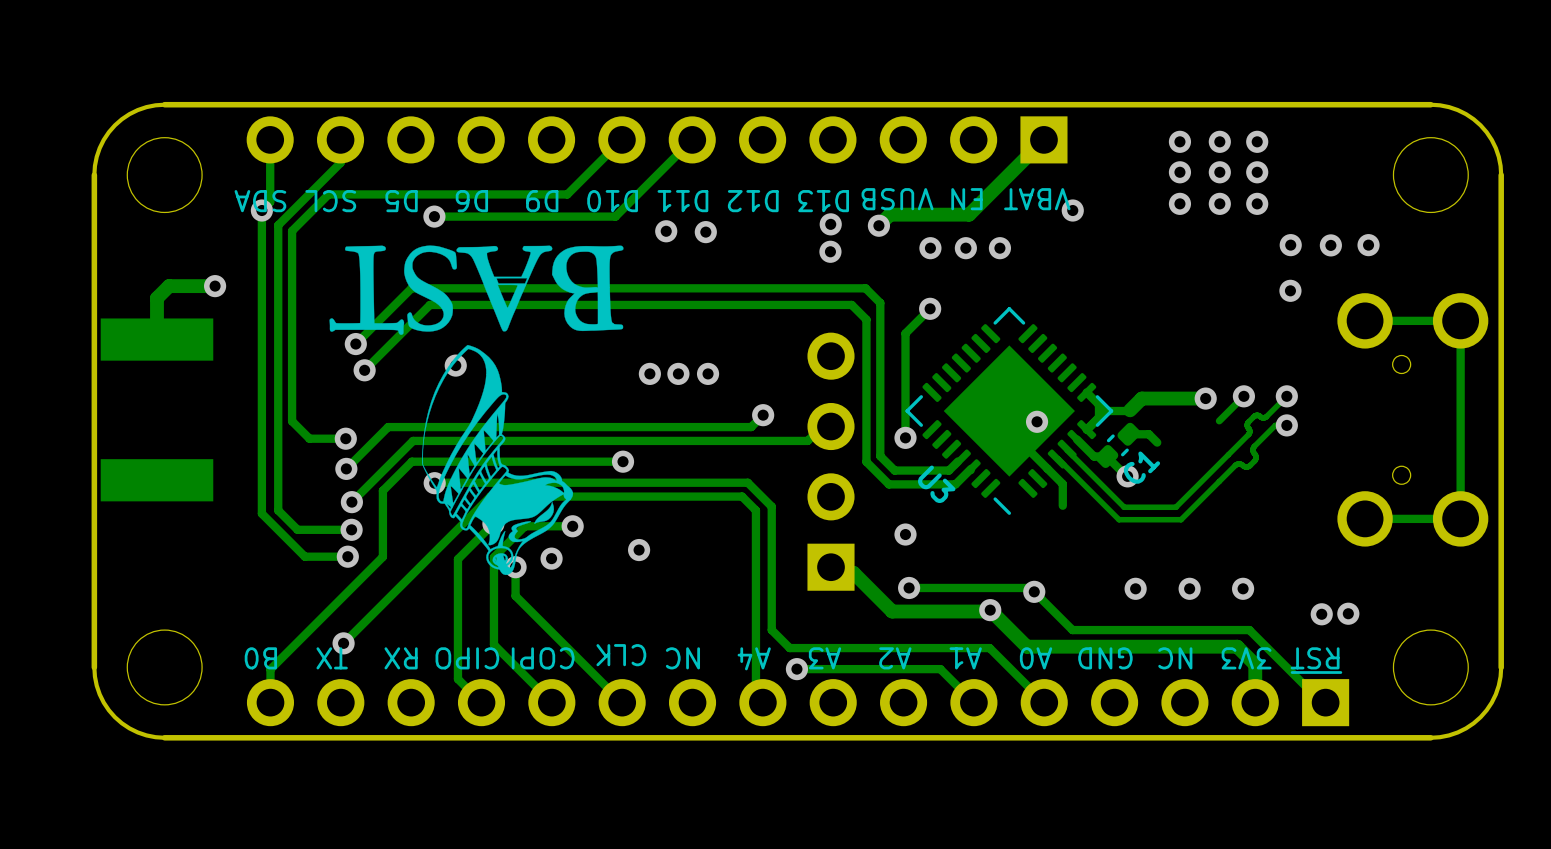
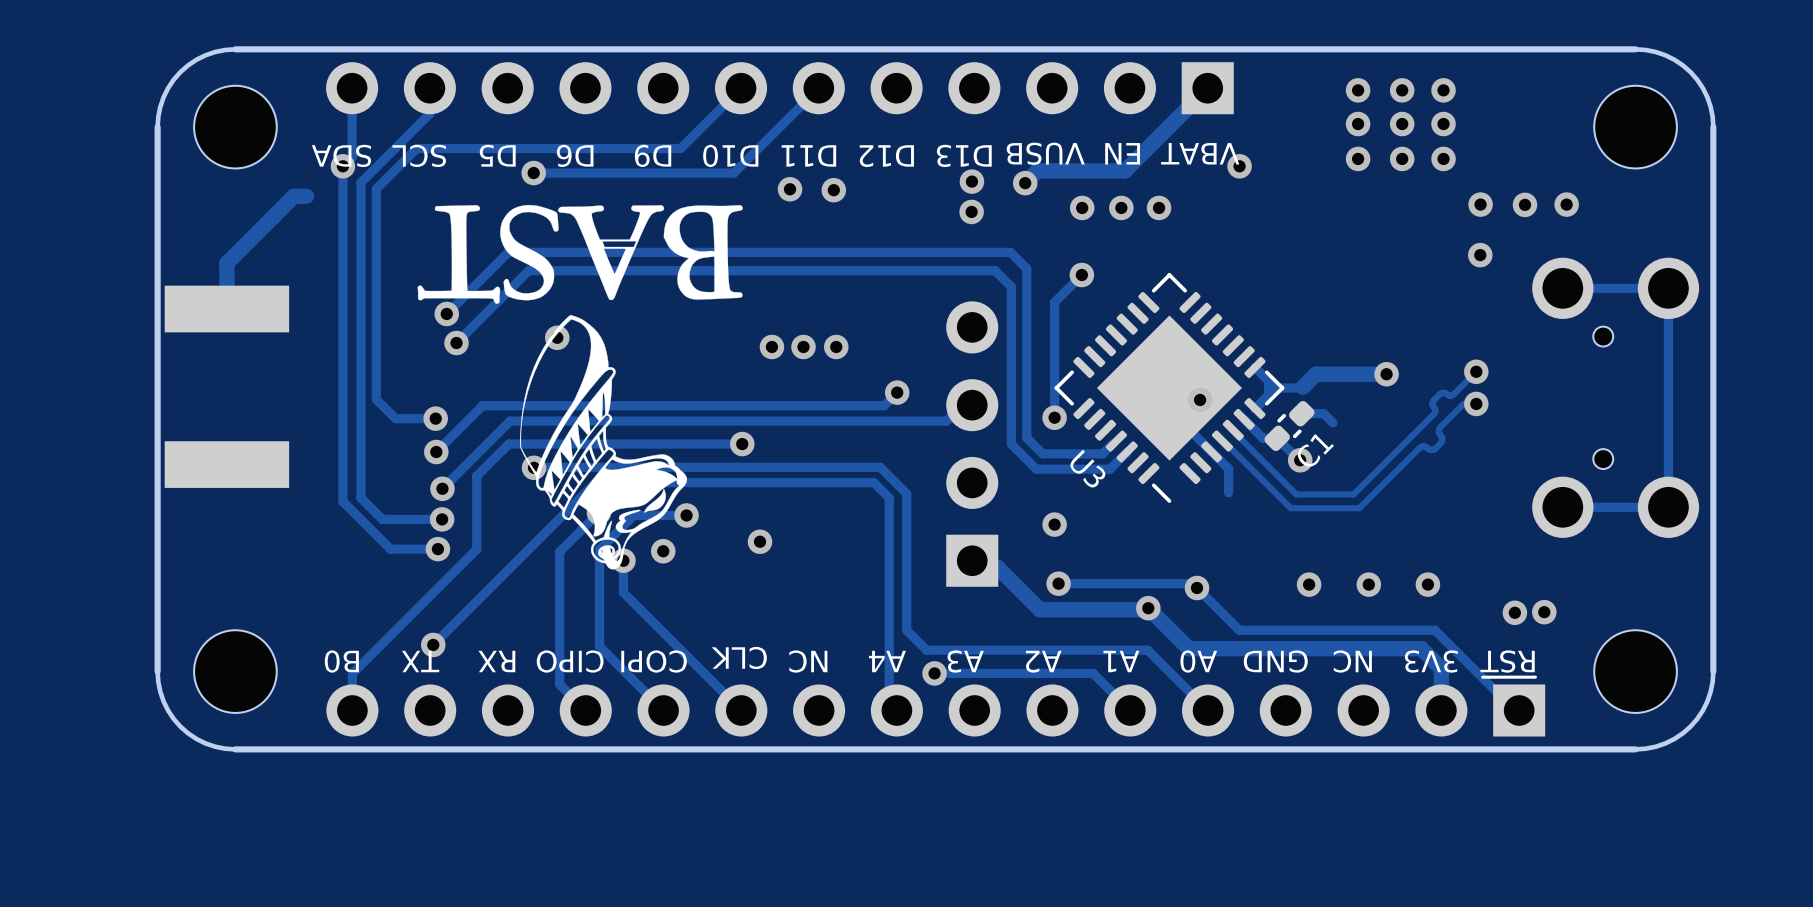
track: (215, 286) (169, 286) -> (306, 196) (293, 196) (240, 249)
via: (215, 286) -> none
track: (1243, 396) (1219, 420) -> none
via: (1243, 396) -> none

